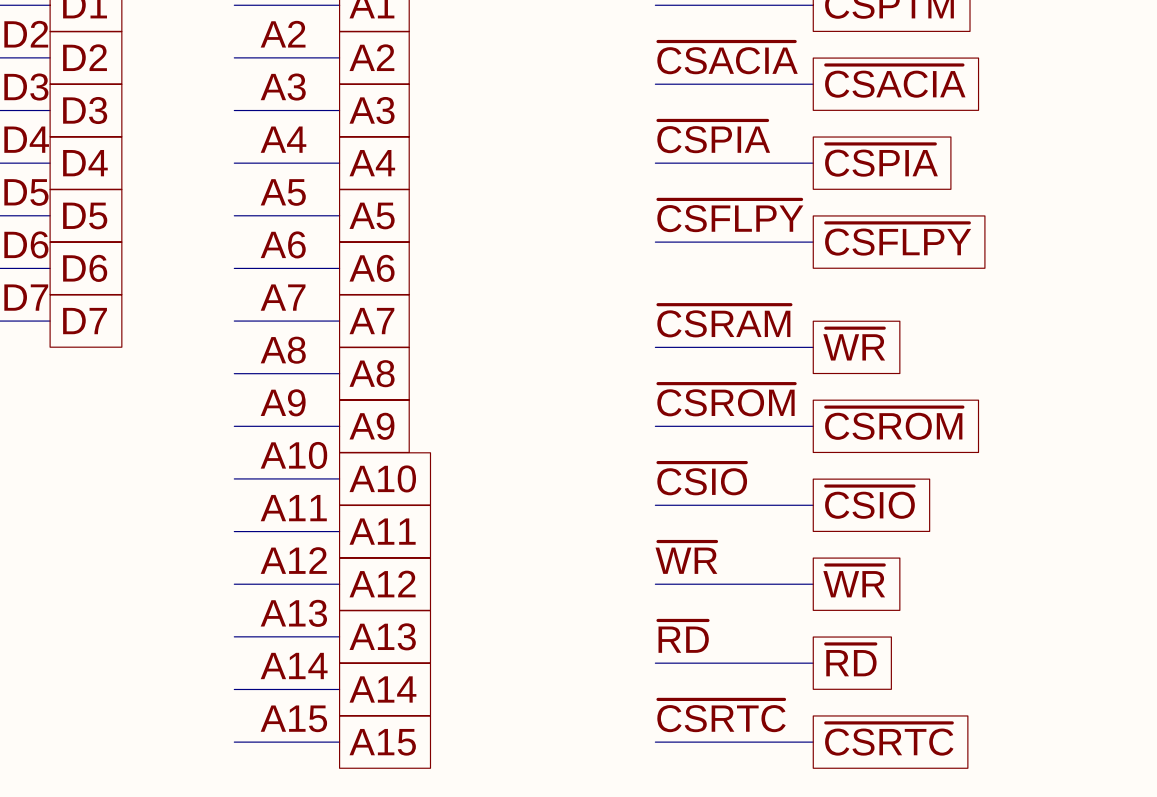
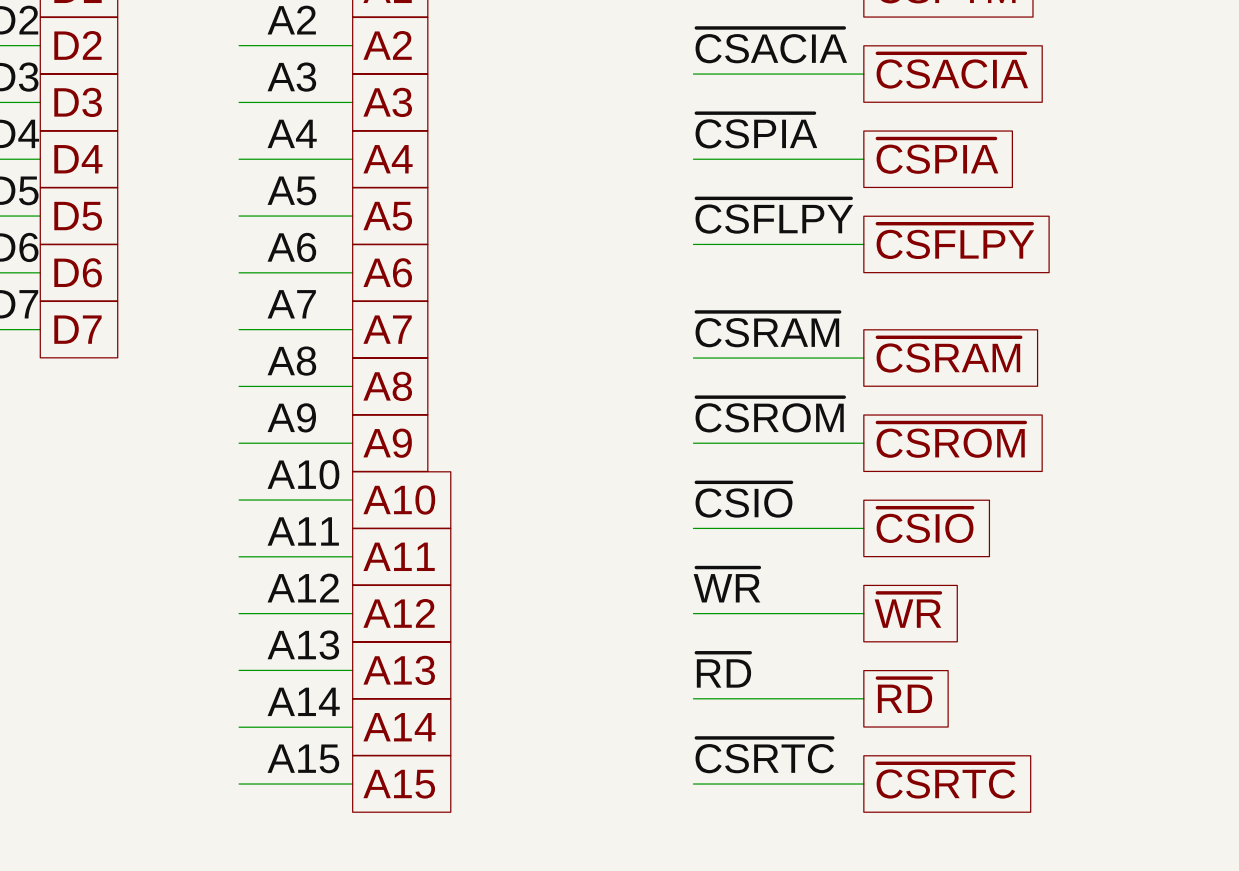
global label: ~{WR} (854, 344) -> ~{CSRAM} (948, 354)

